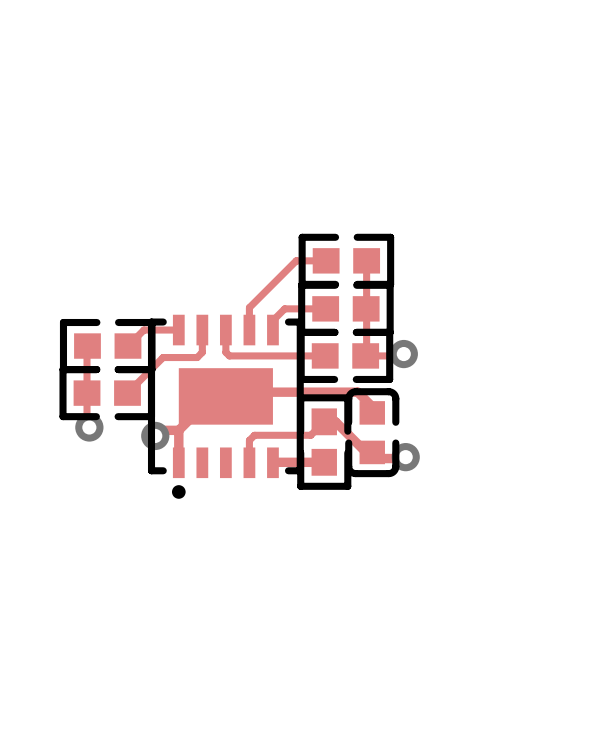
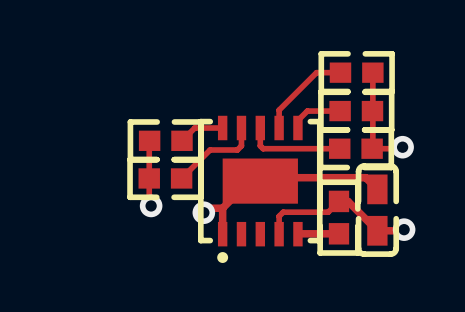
part footprint: [345, 388, 400, 478] -> [355, 163, 400, 257]

